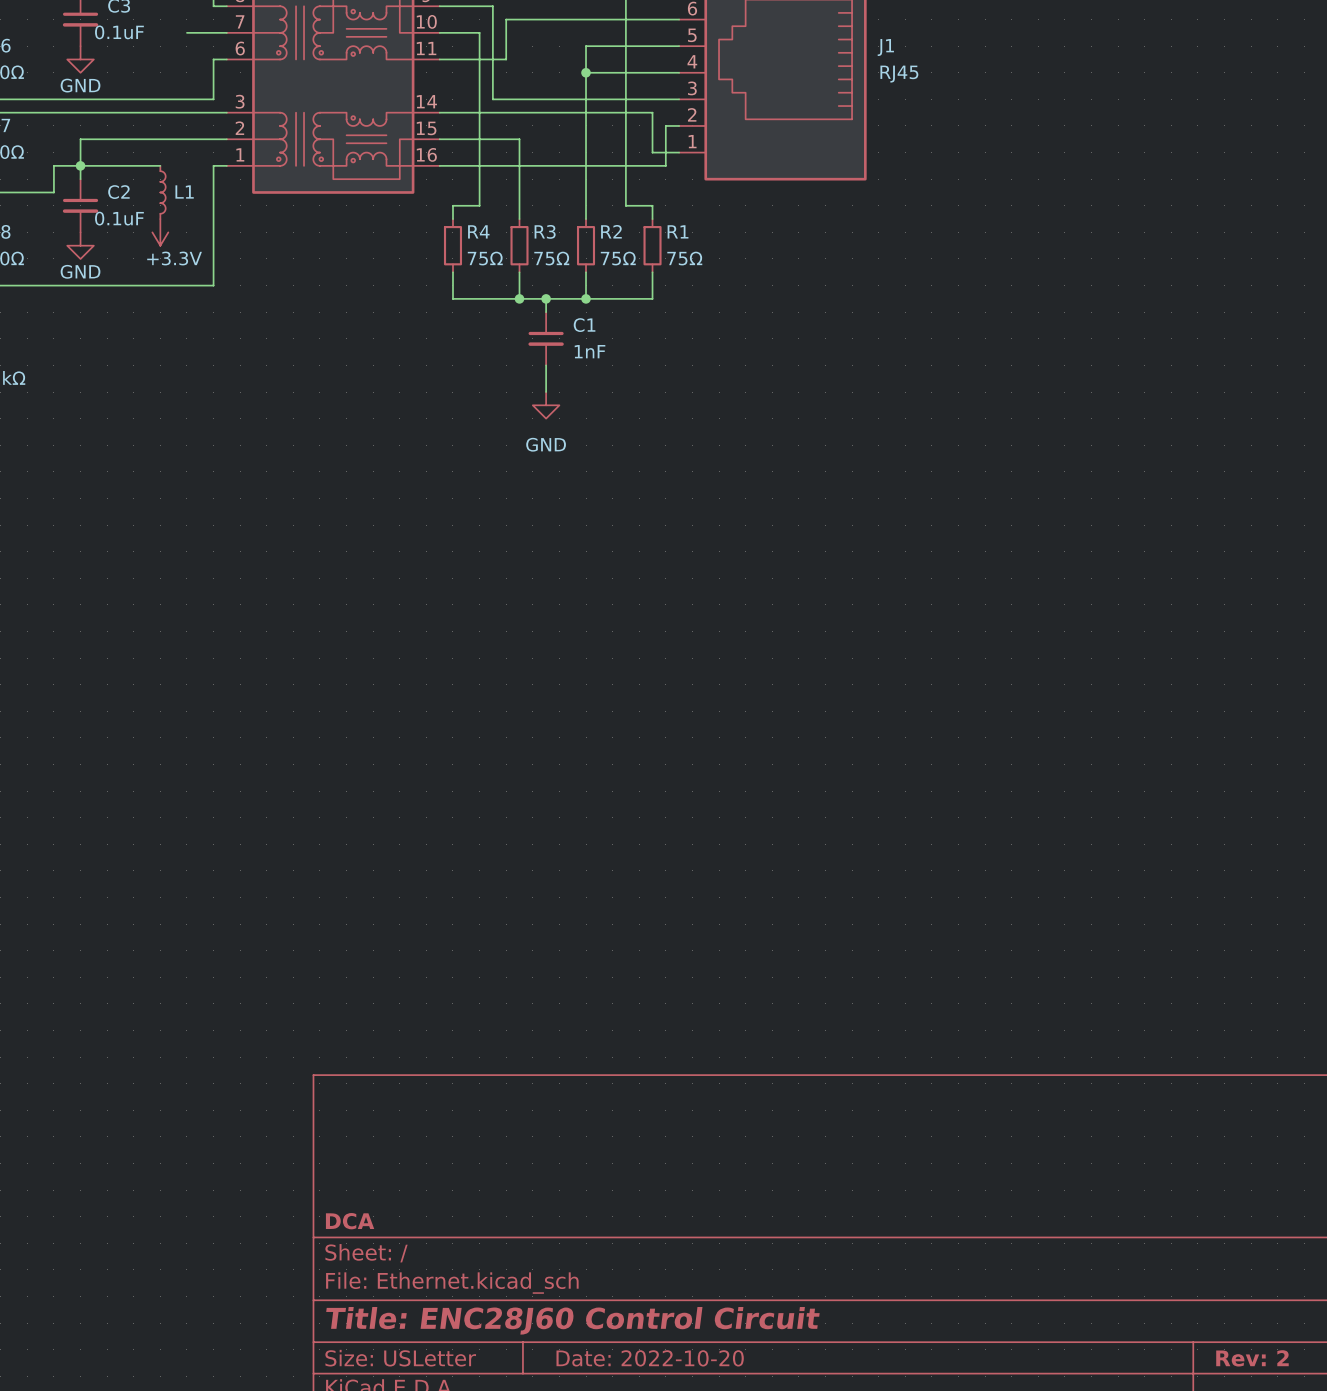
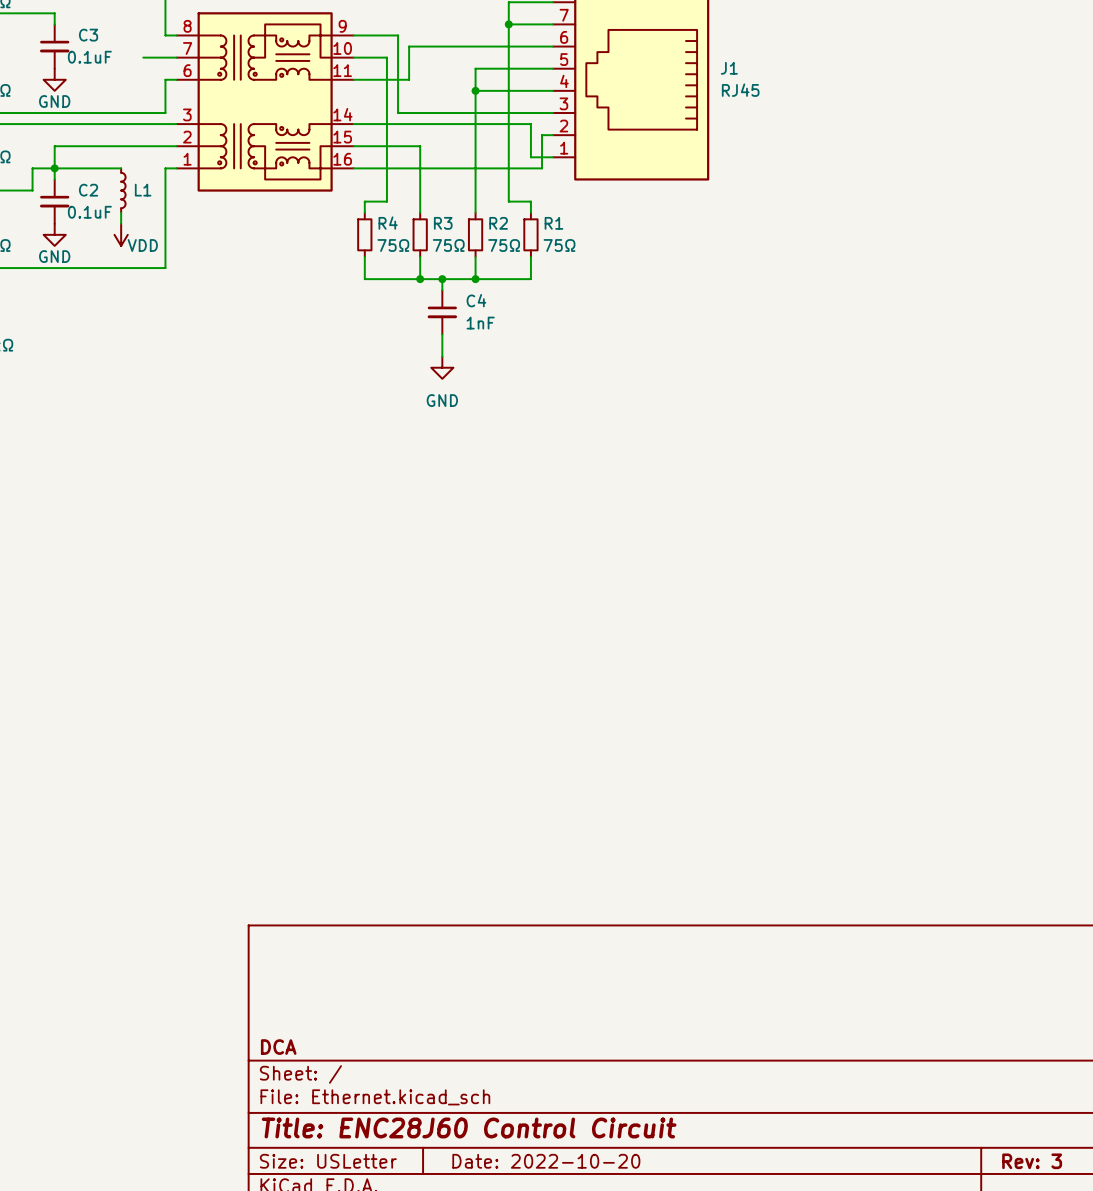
power symbol: +3.3V (160, 232) -> none
power symbol: none -> VDD (121, 234)
C1 name: C1 (584, 325) -> C4 (476, 300)
title block: Rev: 2 (1252, 1358) -> Rev: 3 (1032, 1161)

